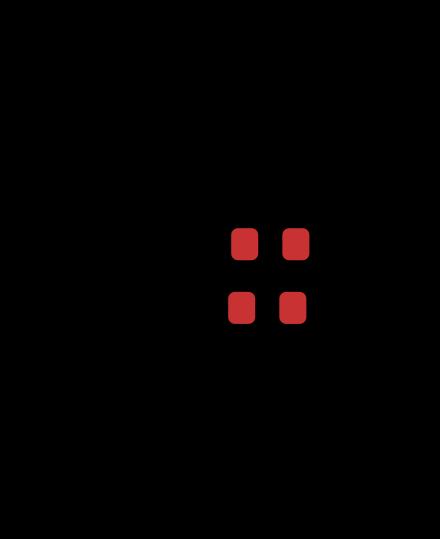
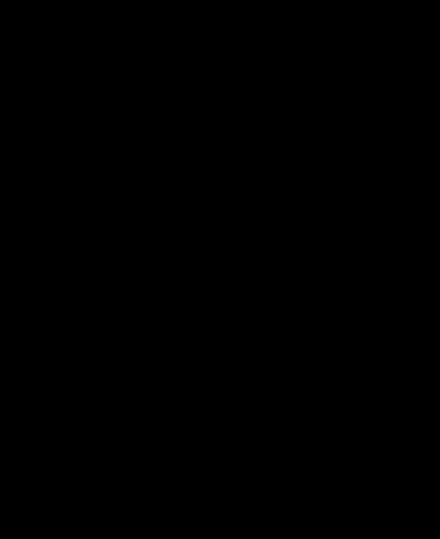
part: (270, 244) -> none
part: (267, 307) -> none

